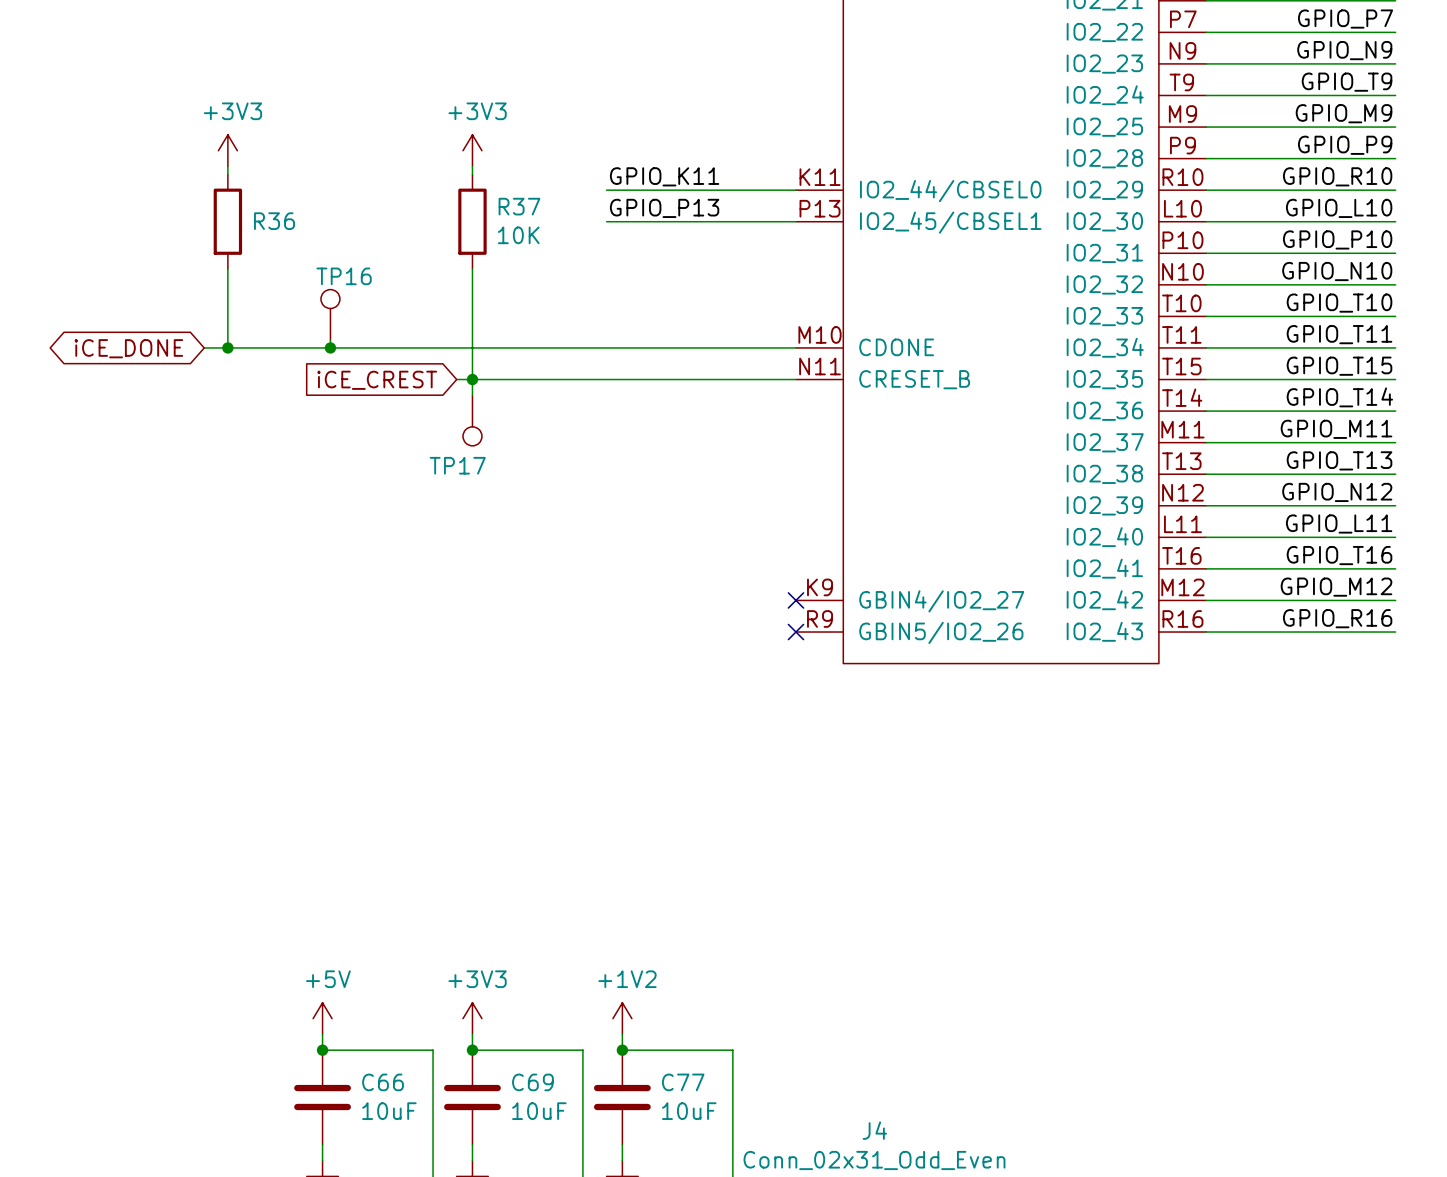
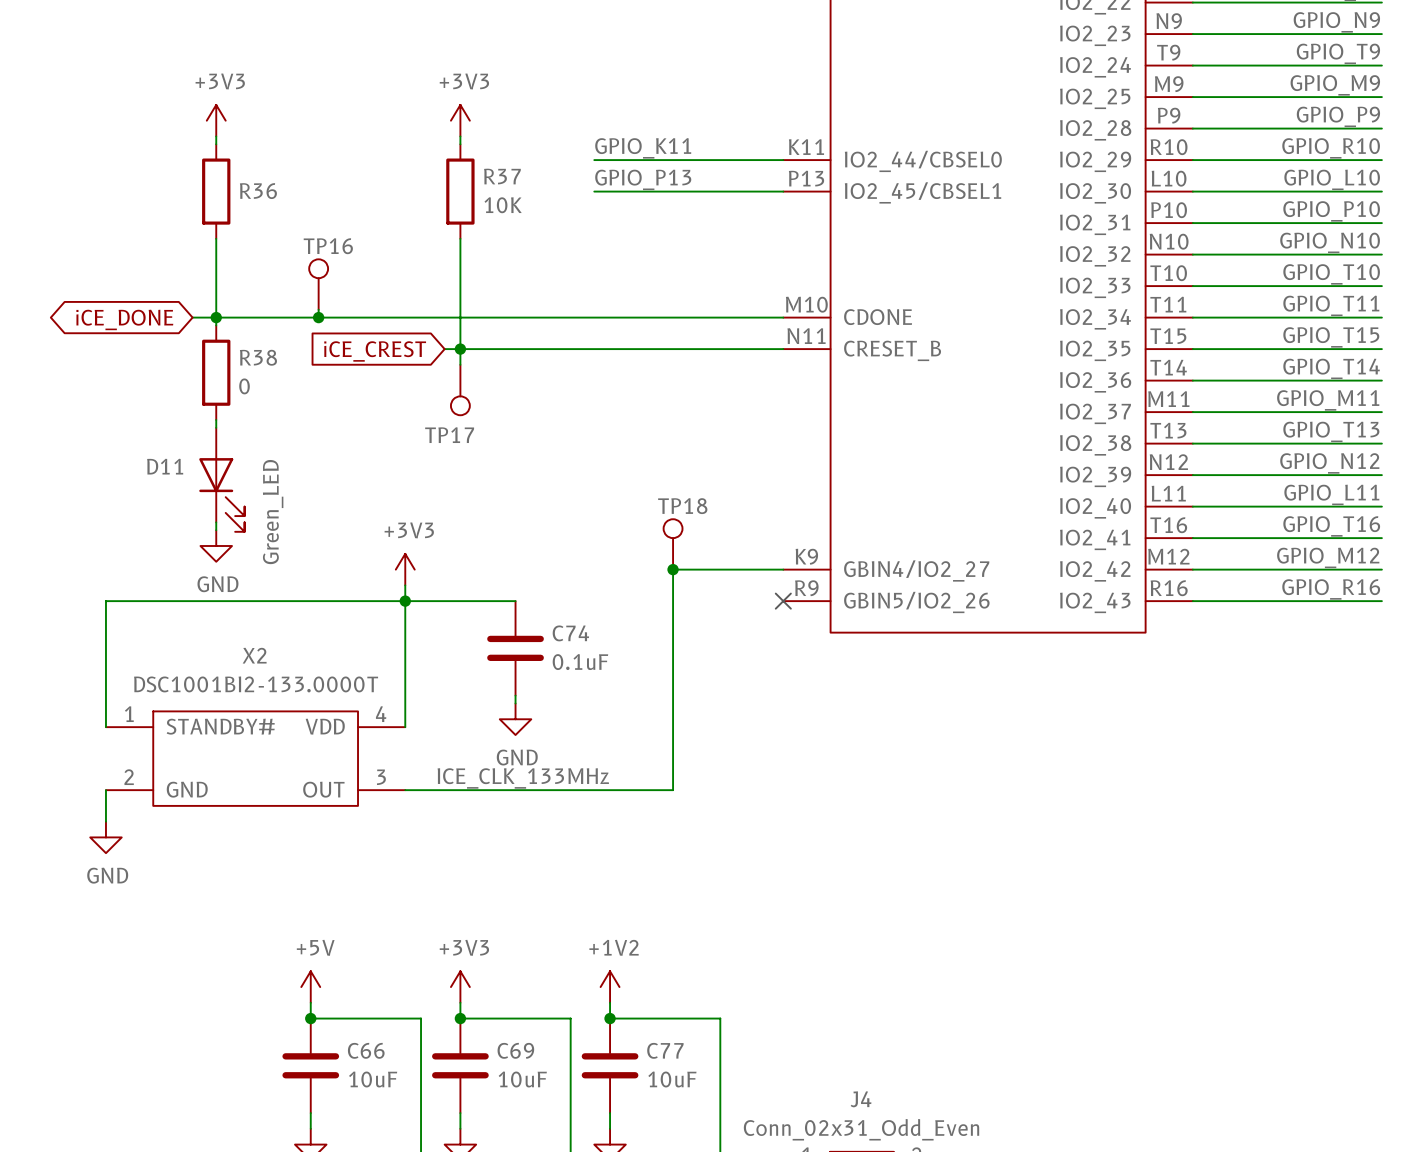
R38: none -> (216, 372)
wire: none -> (216, 419) (216, 427)
D11: none -> Green_LED (221, 479)
wire: none -> (216, 522) (216, 530)
TP18: none -> (673, 544)
power symbol: none -> GND (216, 545)
power symbol: none -> +3V3 (405, 569)
junction: none -> (673, 569)
wire: none -> (783, 569) (673, 569) (673, 790) (405, 790)
no-connect mark: (795, 600) -> none
wire: none -> (405, 585) (405, 727)
junction: none -> (405, 601)
wire: none -> (515, 601) (105, 601) (105, 727)
C74: none -> (515, 648)
wire: none -> (515, 695) (515, 703)
power symbol: none -> GND (515, 719)
X2: none -> DSC1001BI2-133.0000T (255, 758)
label: none -> ICE_CLK_133MHz (523, 778)
wire: none -> (105, 790) (105, 821)
power symbol: none -> GND (105, 837)

